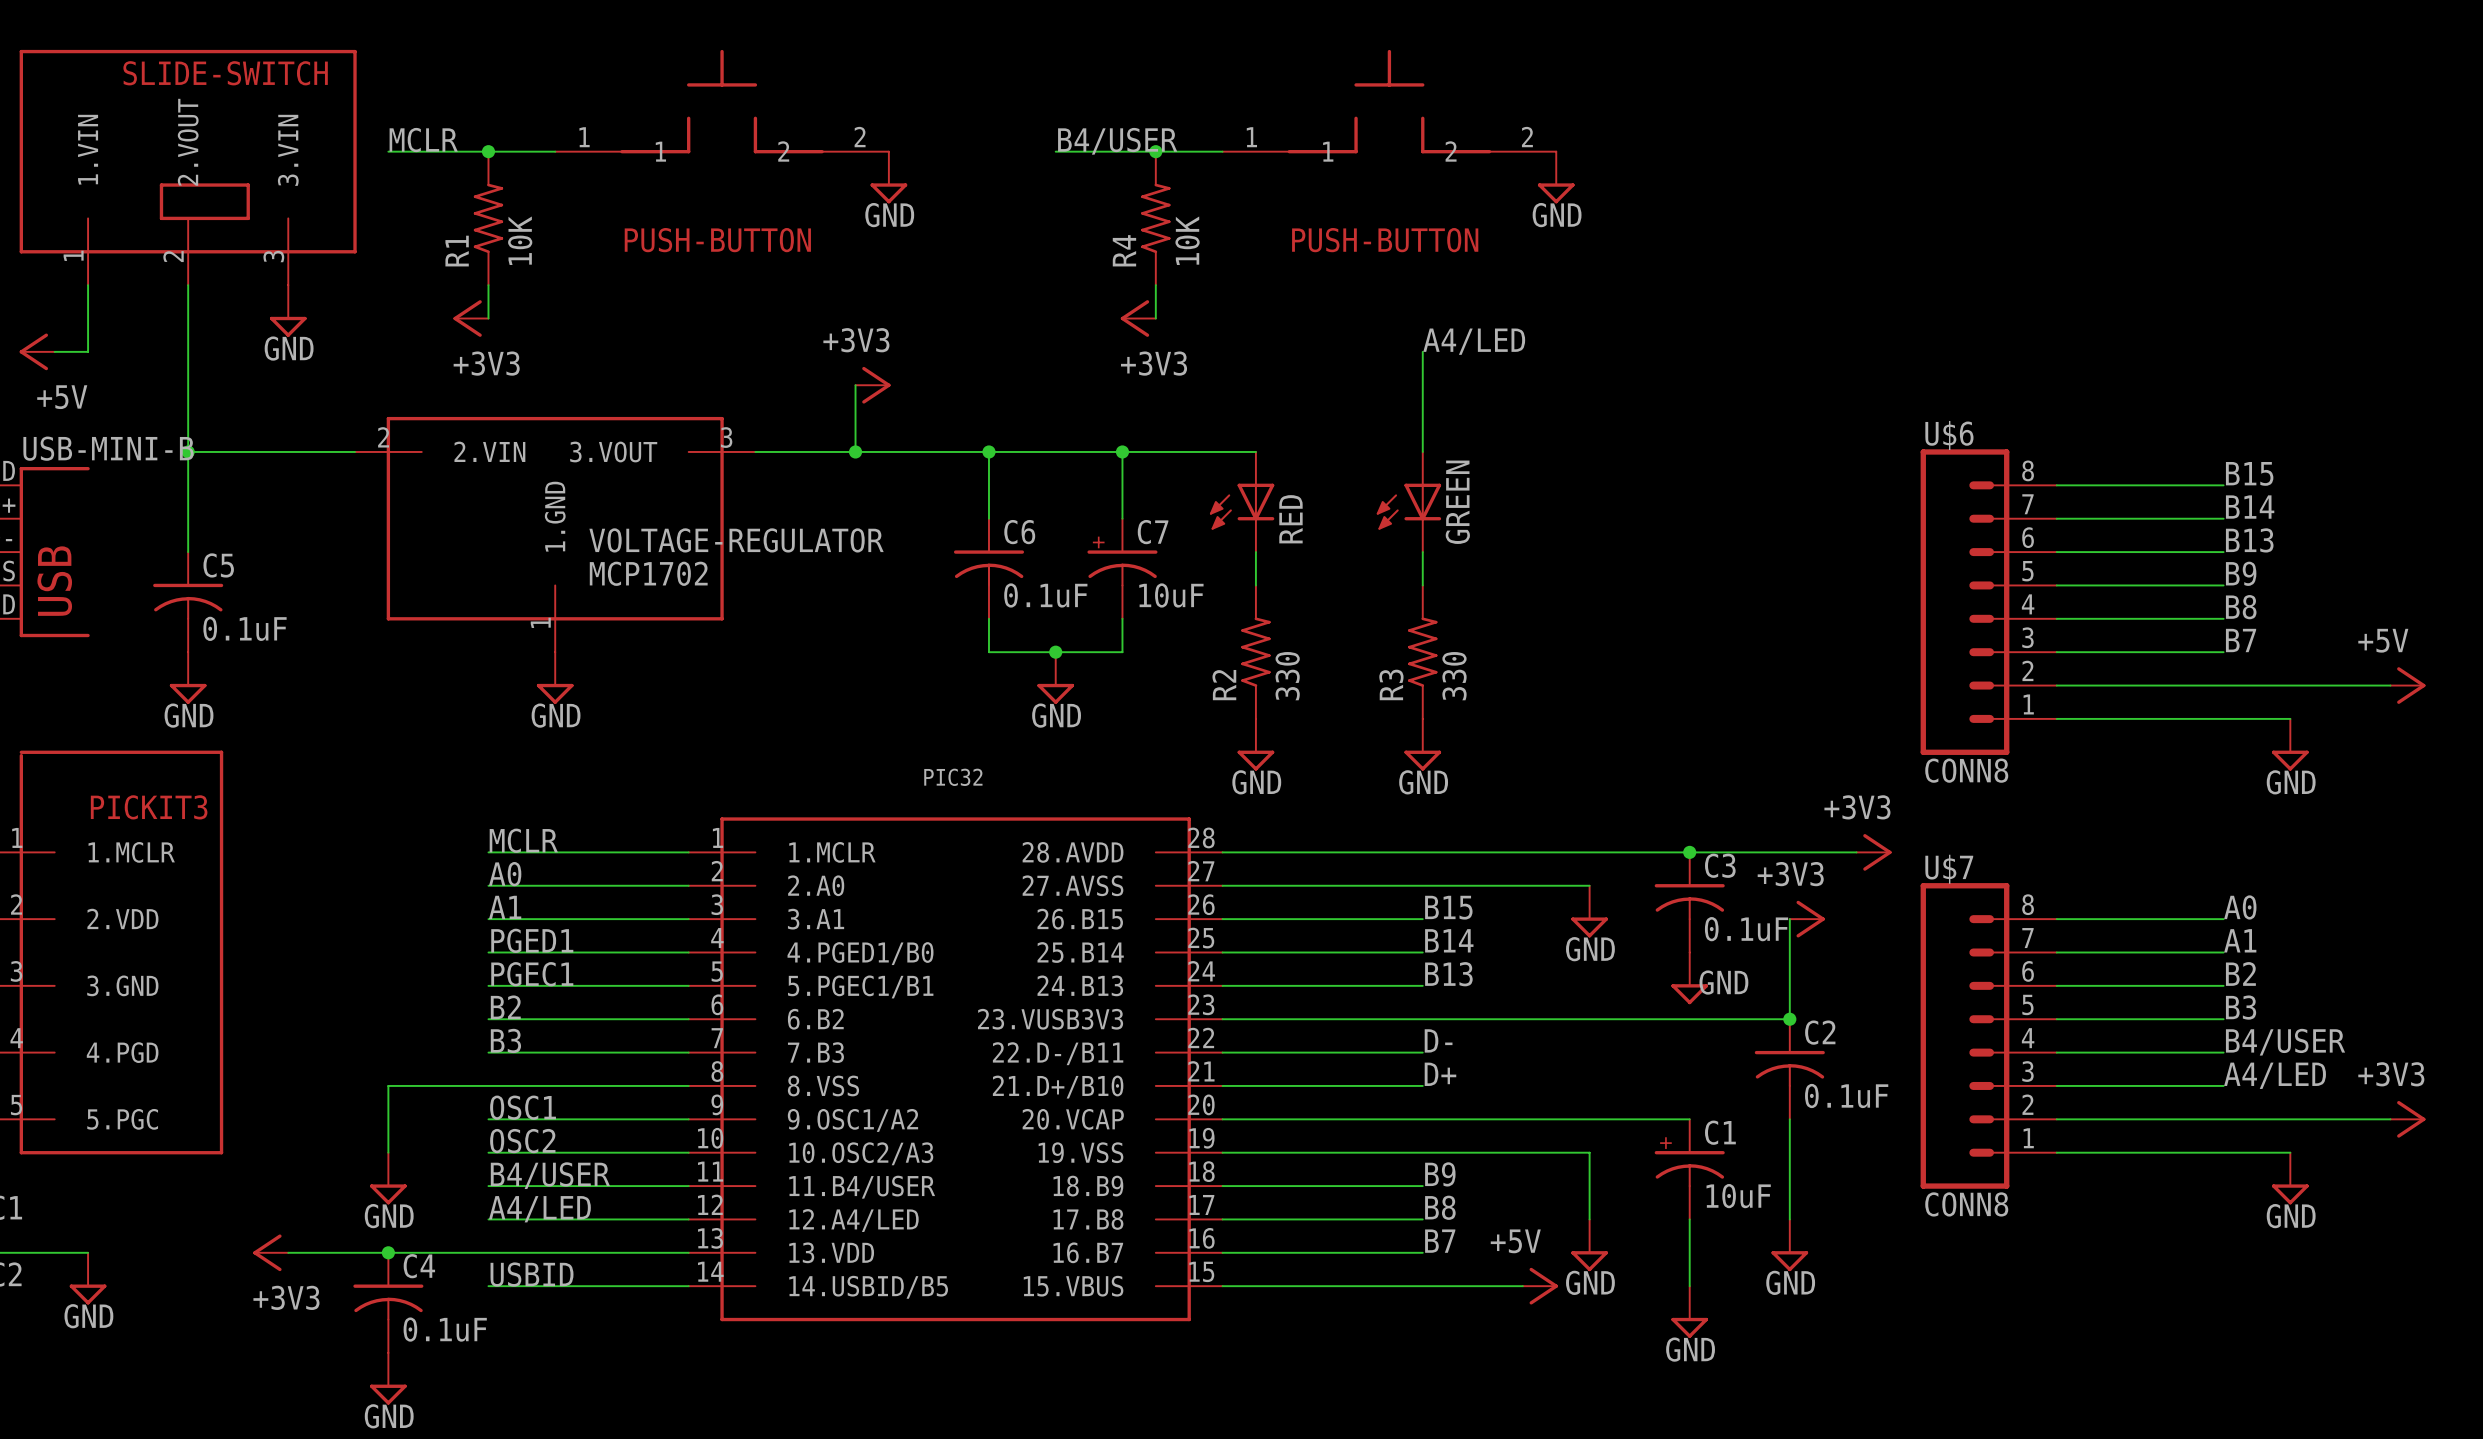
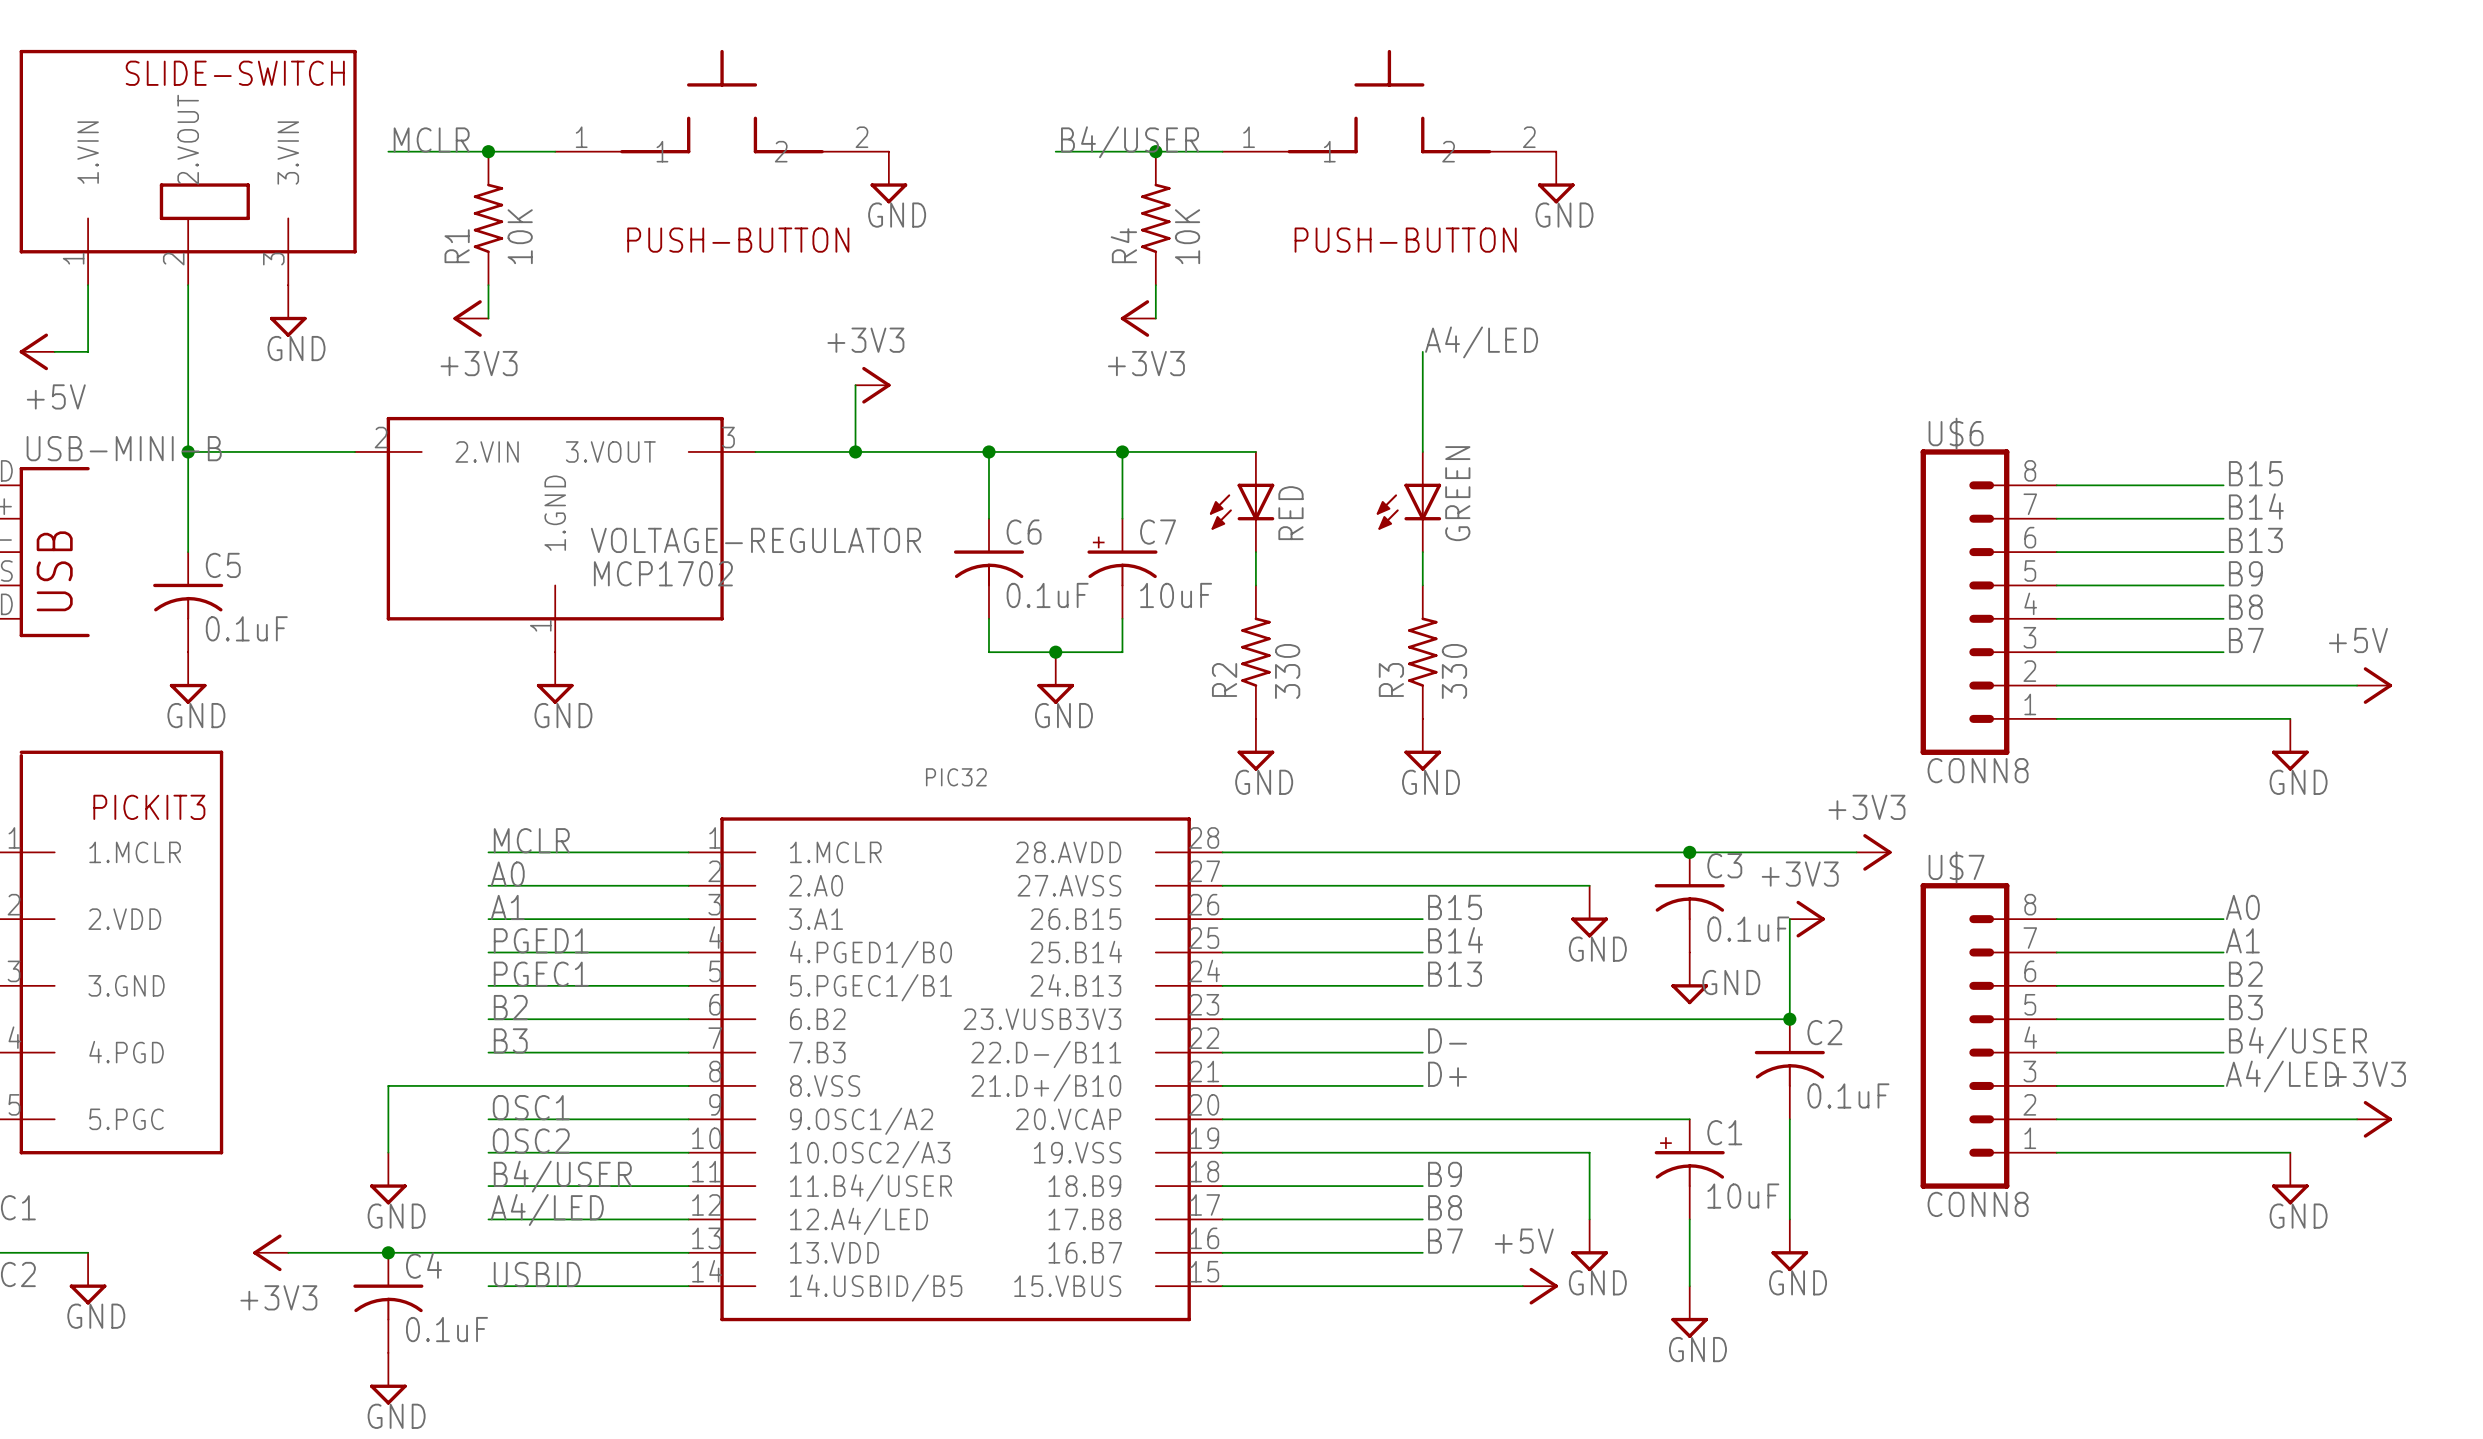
power symbol position: +5V (2407, 685) -> +5V (2374, 685)
power symbol position: +3V3 (2407, 1119) -> +3V3 (2374, 1119)

